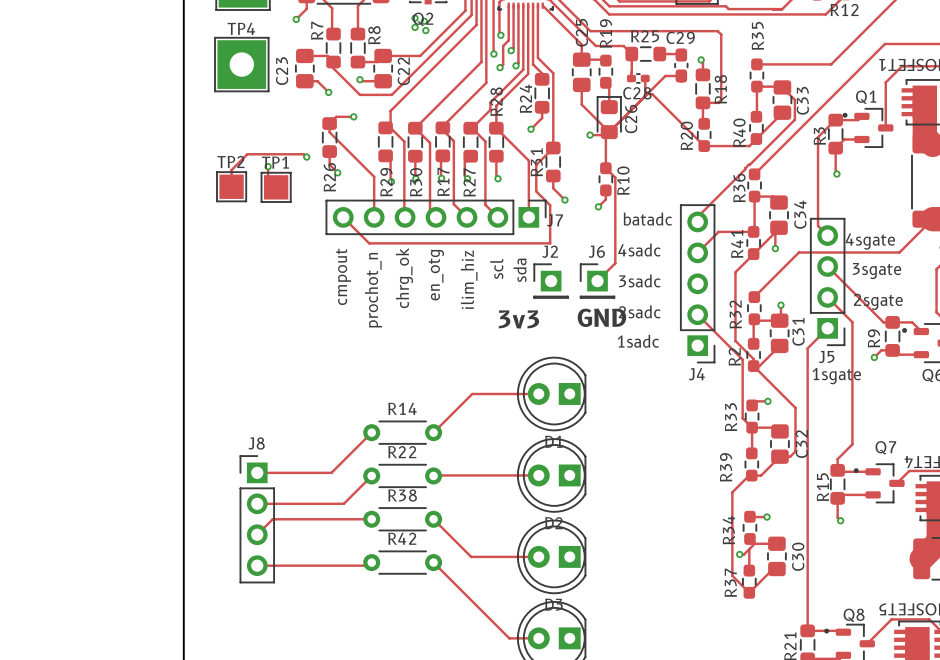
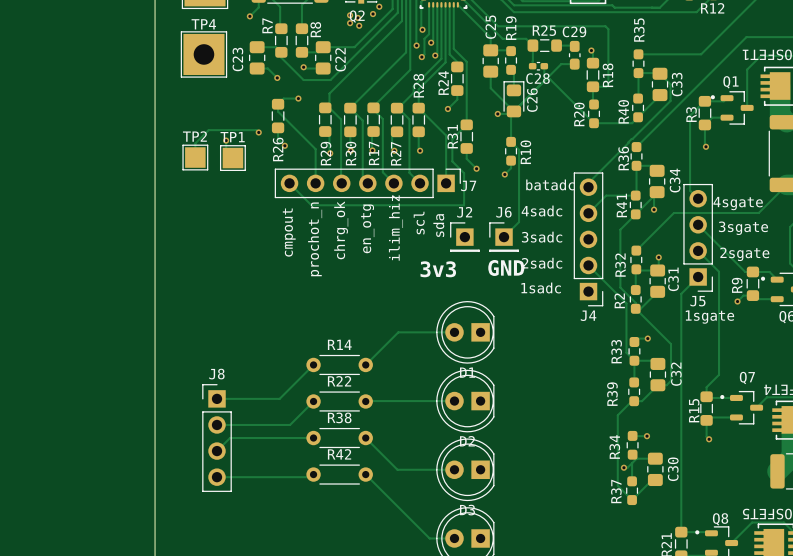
via: none -> (379, 6)
via: none -> (373, 14)

